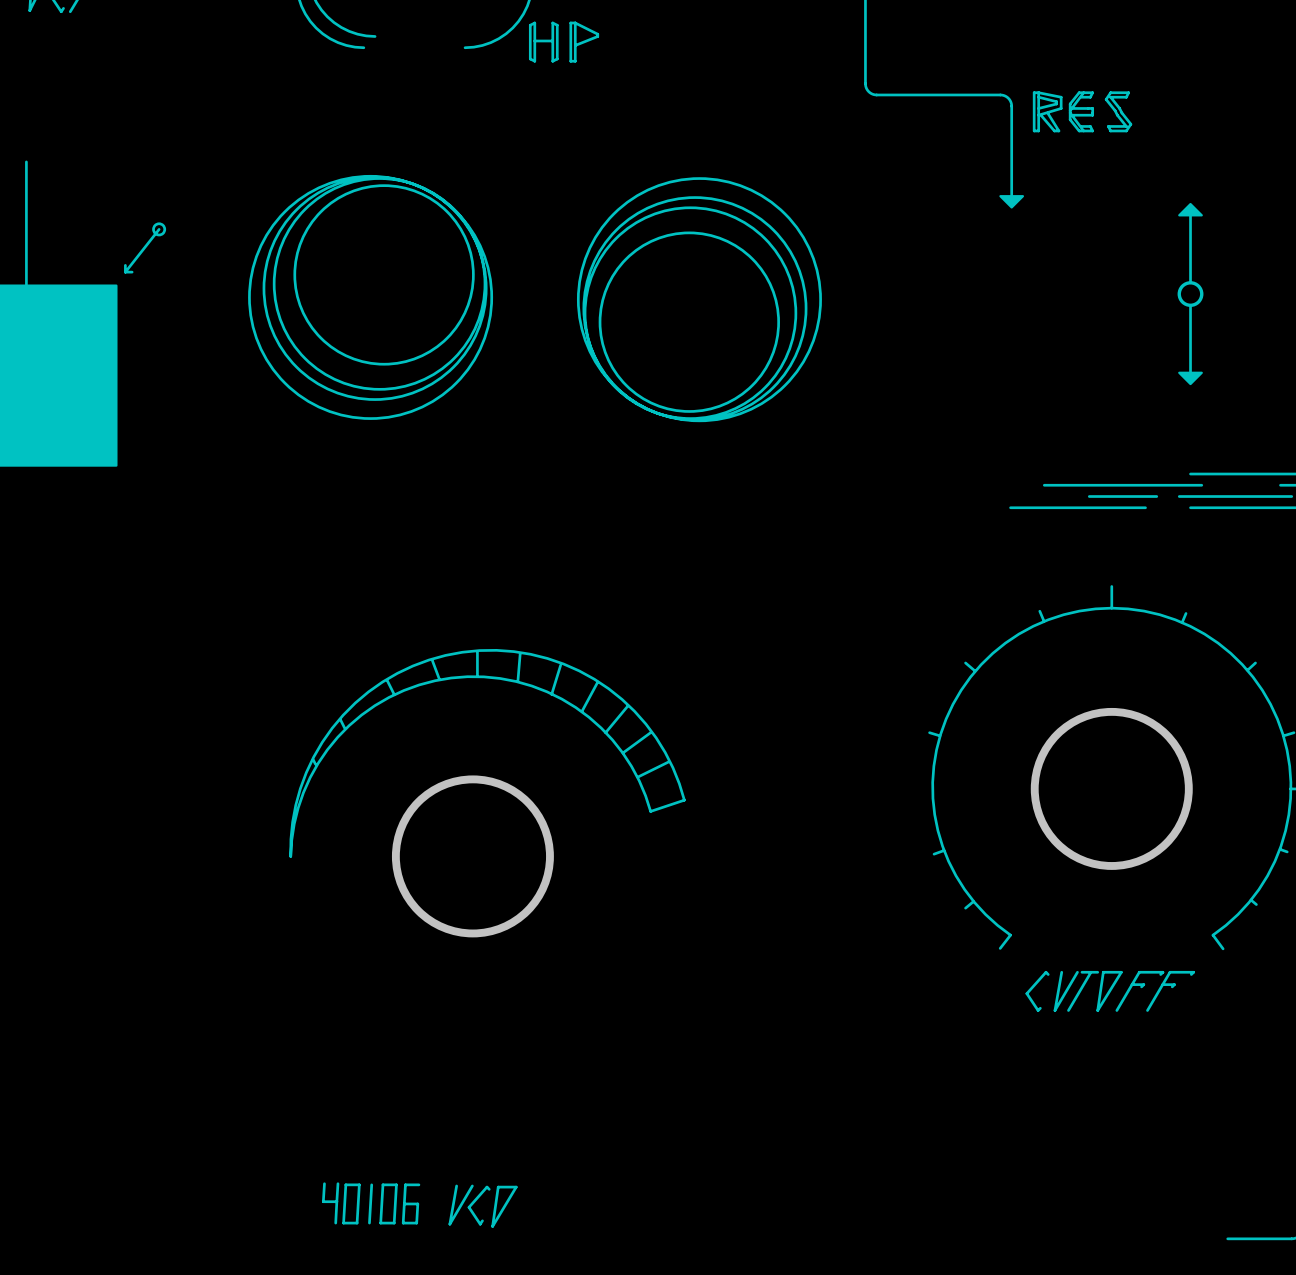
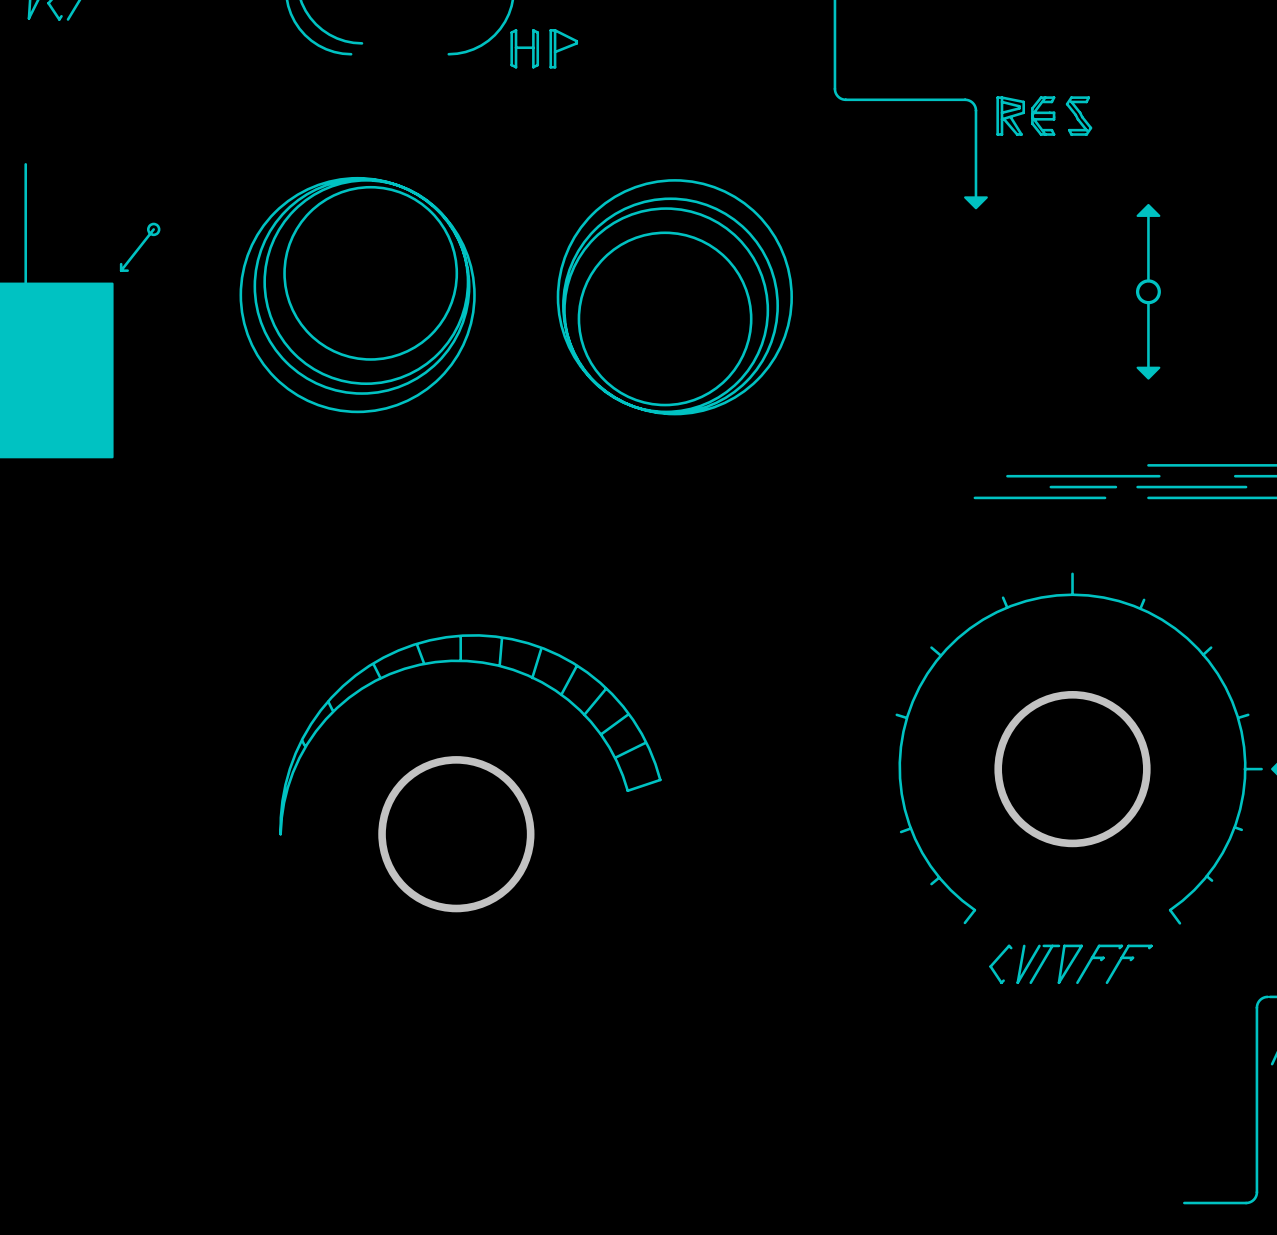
line: (324, 1183) (323, 1201) (336, 1201) -> none
line: (337, 1183) (336, 1201) -> none
line: (345, 1184) (343, 1223) (357, 1223) (359, 1184) (345, 1184) -> none
line: (371, 1184) (369, 1223) -> none
line: (382, 1184) (396, 1184) (394, 1223) (380, 1223) (382, 1184) -> none
line: (418, 1184) (405, 1184) (403, 1223) (416, 1223) (417, 1203) (404, 1203) -> none
line: (456, 1185) (449, 1224) (472, 1185) -> none
line: (498, 1187) (492, 1226) (516, 1187) (498, 1187) -> none
line: (489, 1189) (486, 1187) (468, 1207) (480, 1224) (482, 1220) -> none
line: (336, 1201) (335, 1223) -> none

